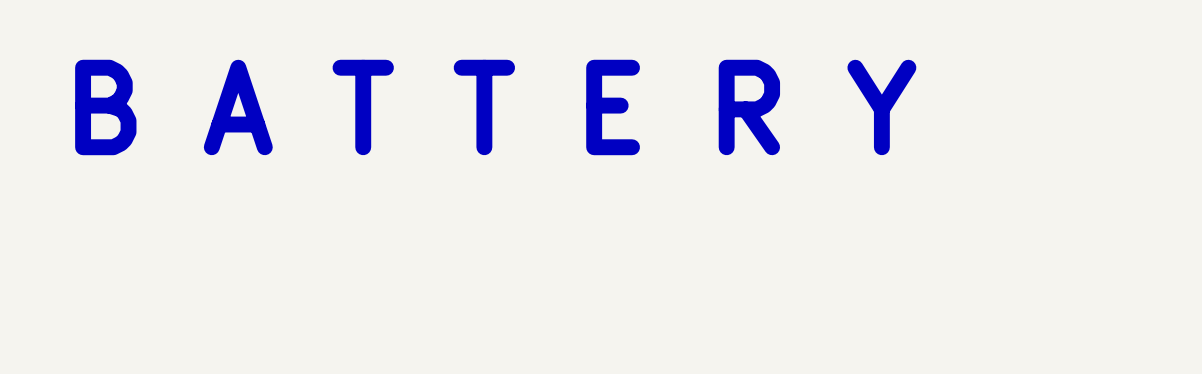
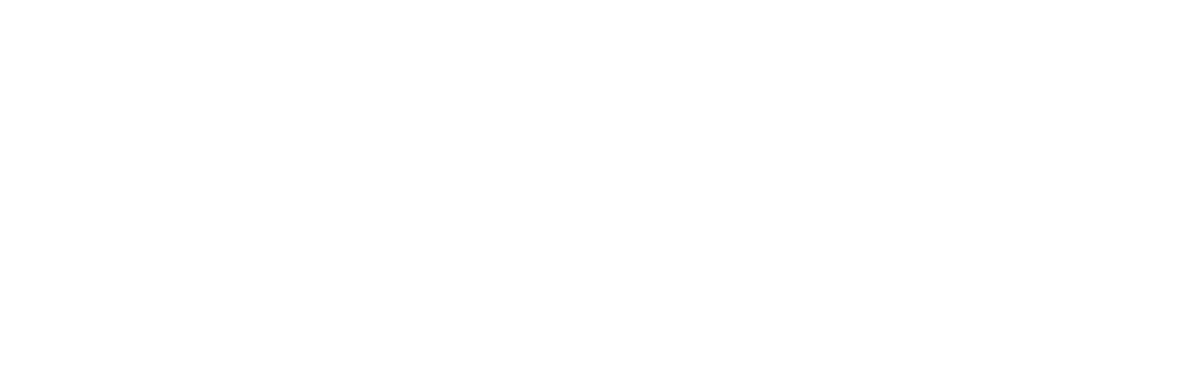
text: B A T T E R Y (495, 107) -> none

